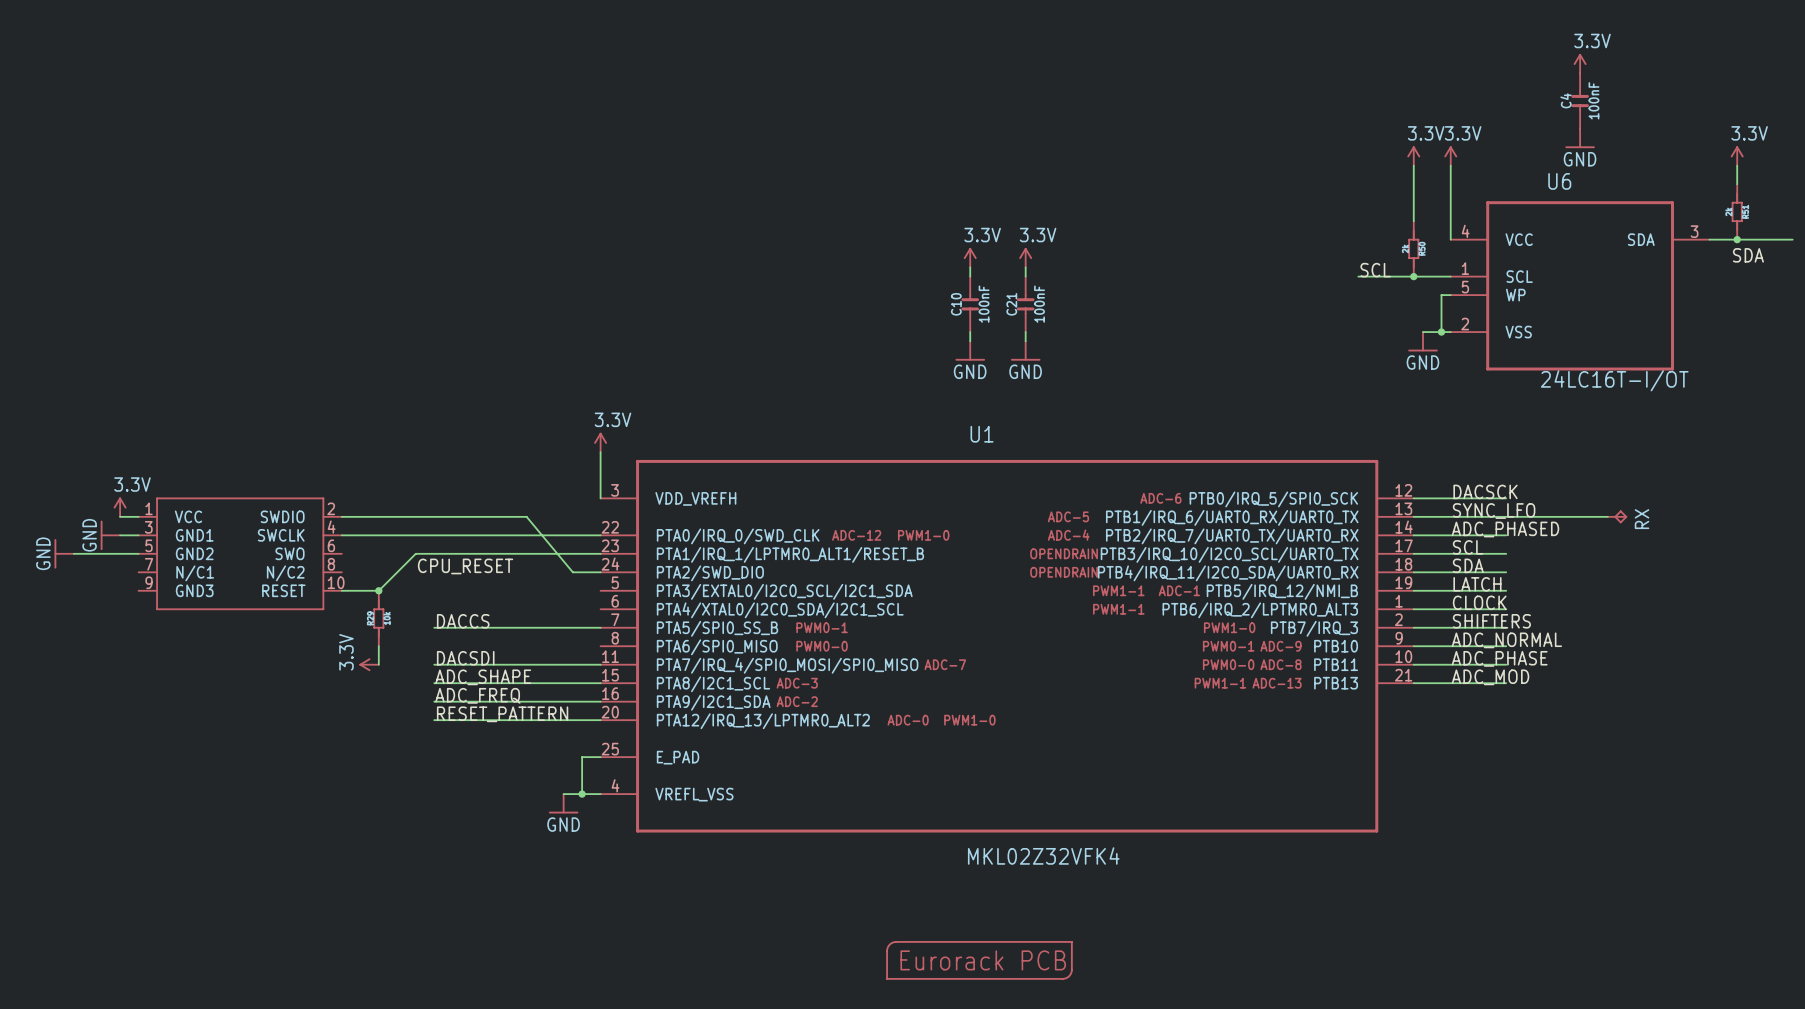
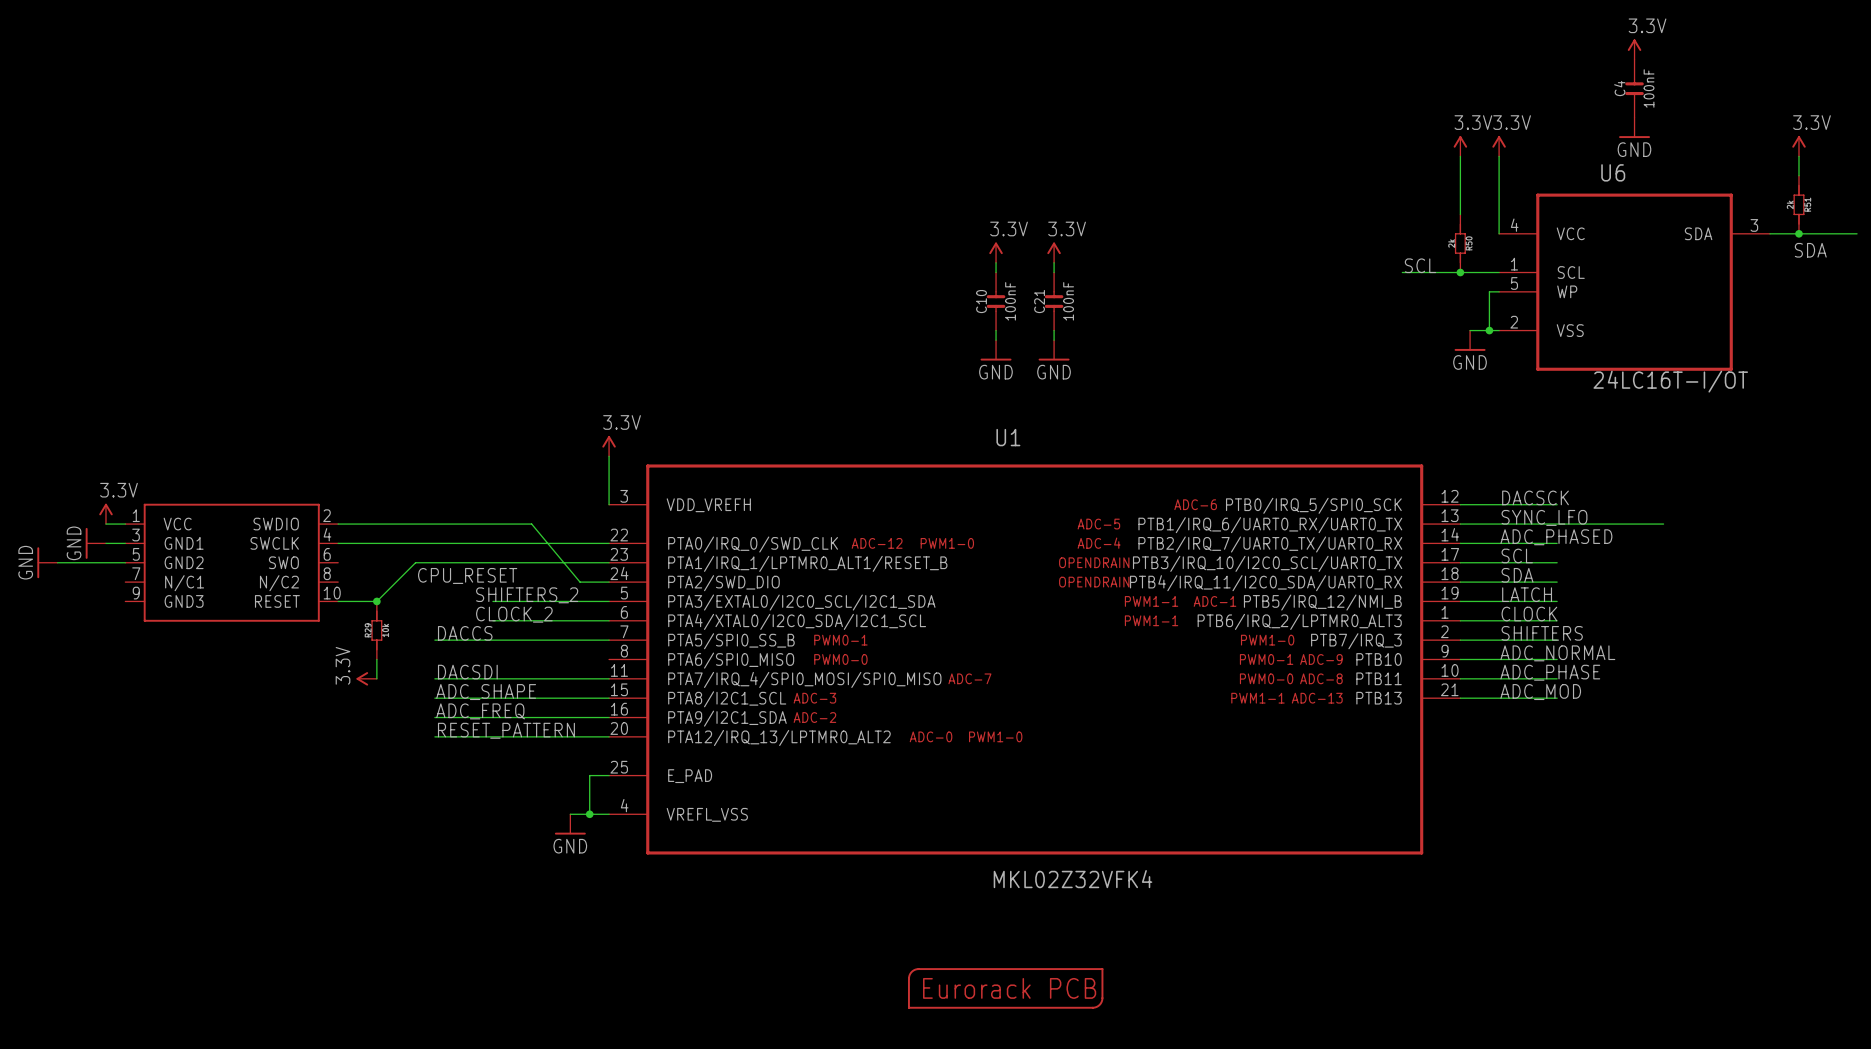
RX: (1617, 516) -> none
label: none -> SHIFTERS_2 (527, 595)
wire: none -> (492, 601) (609, 601)
label: none -> CLOCK_2 (514, 614)
wire: none -> (492, 620) (609, 620)

